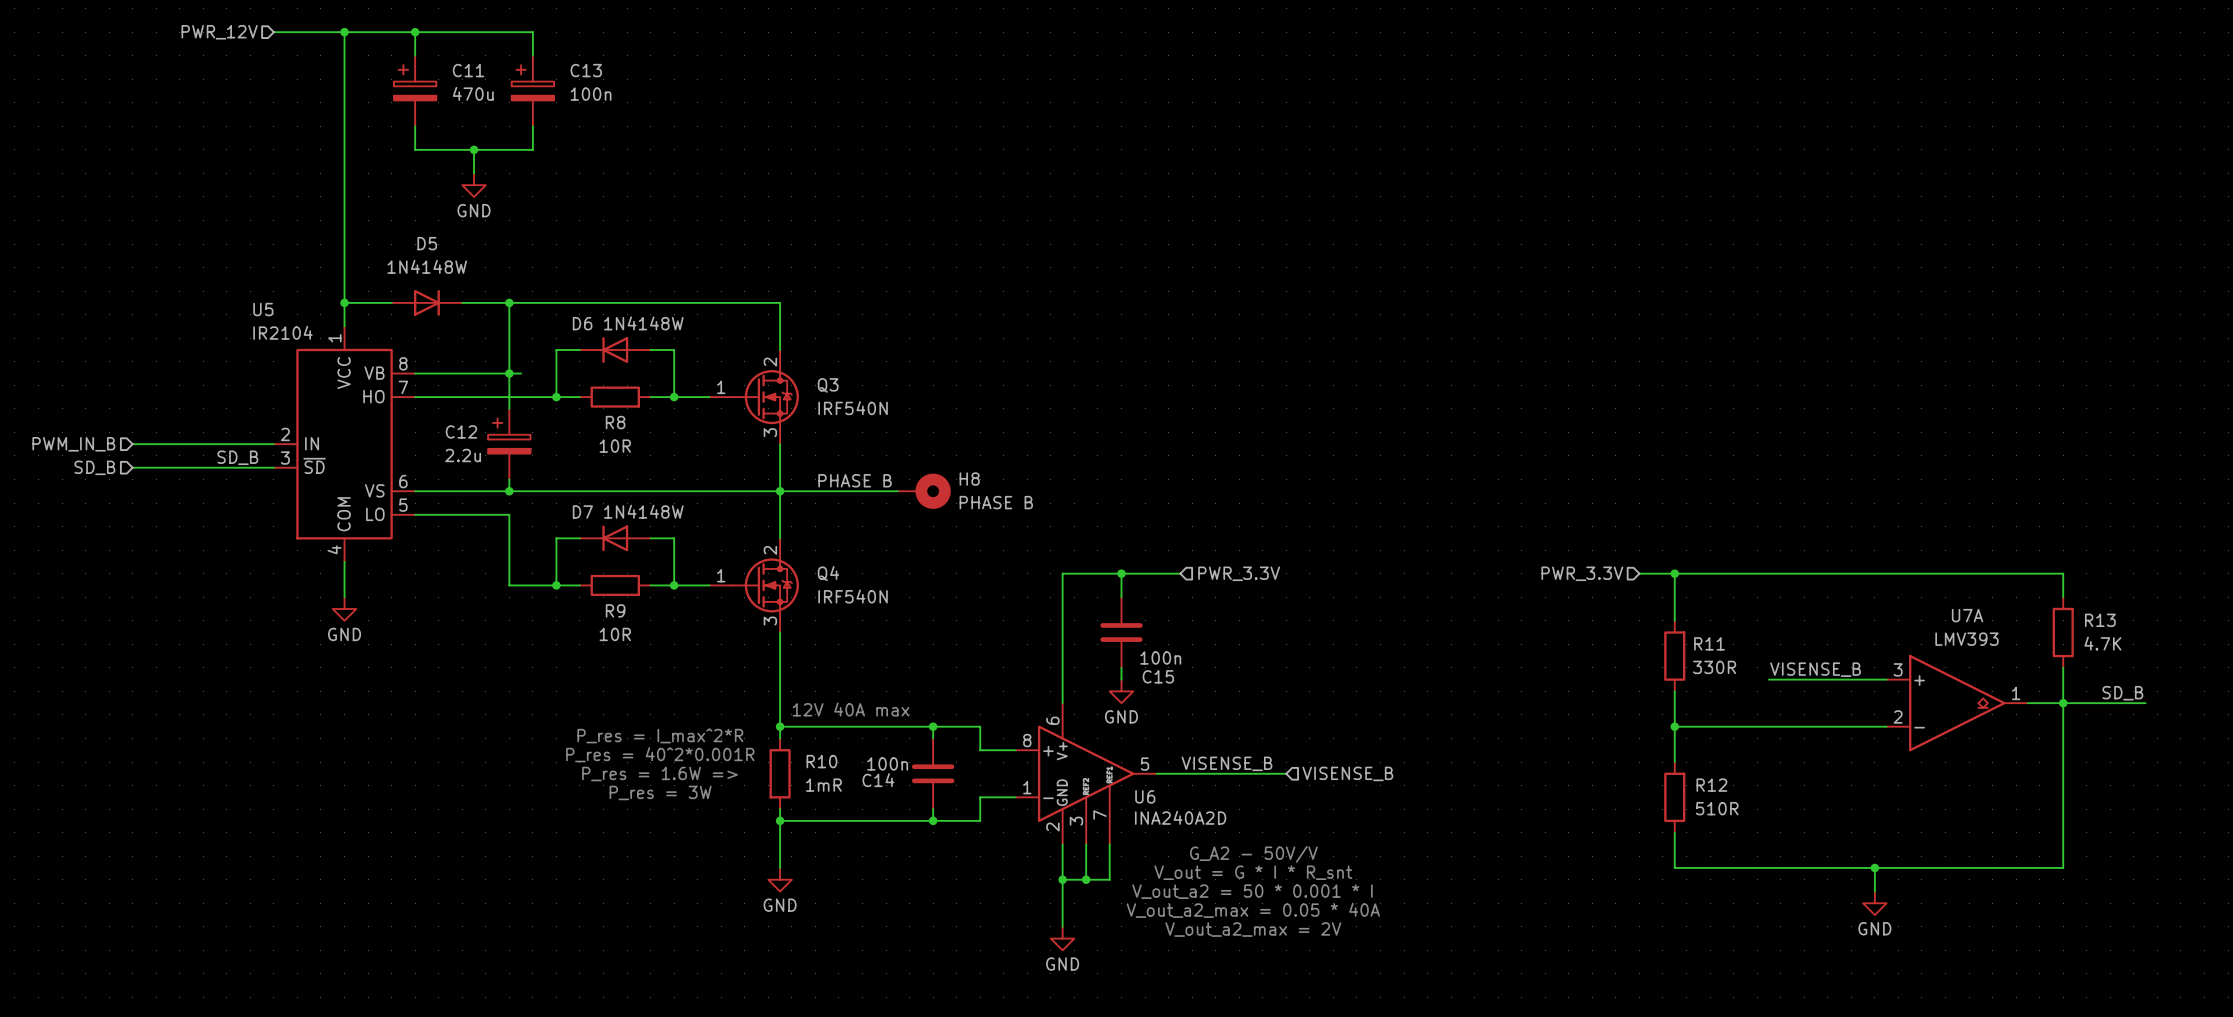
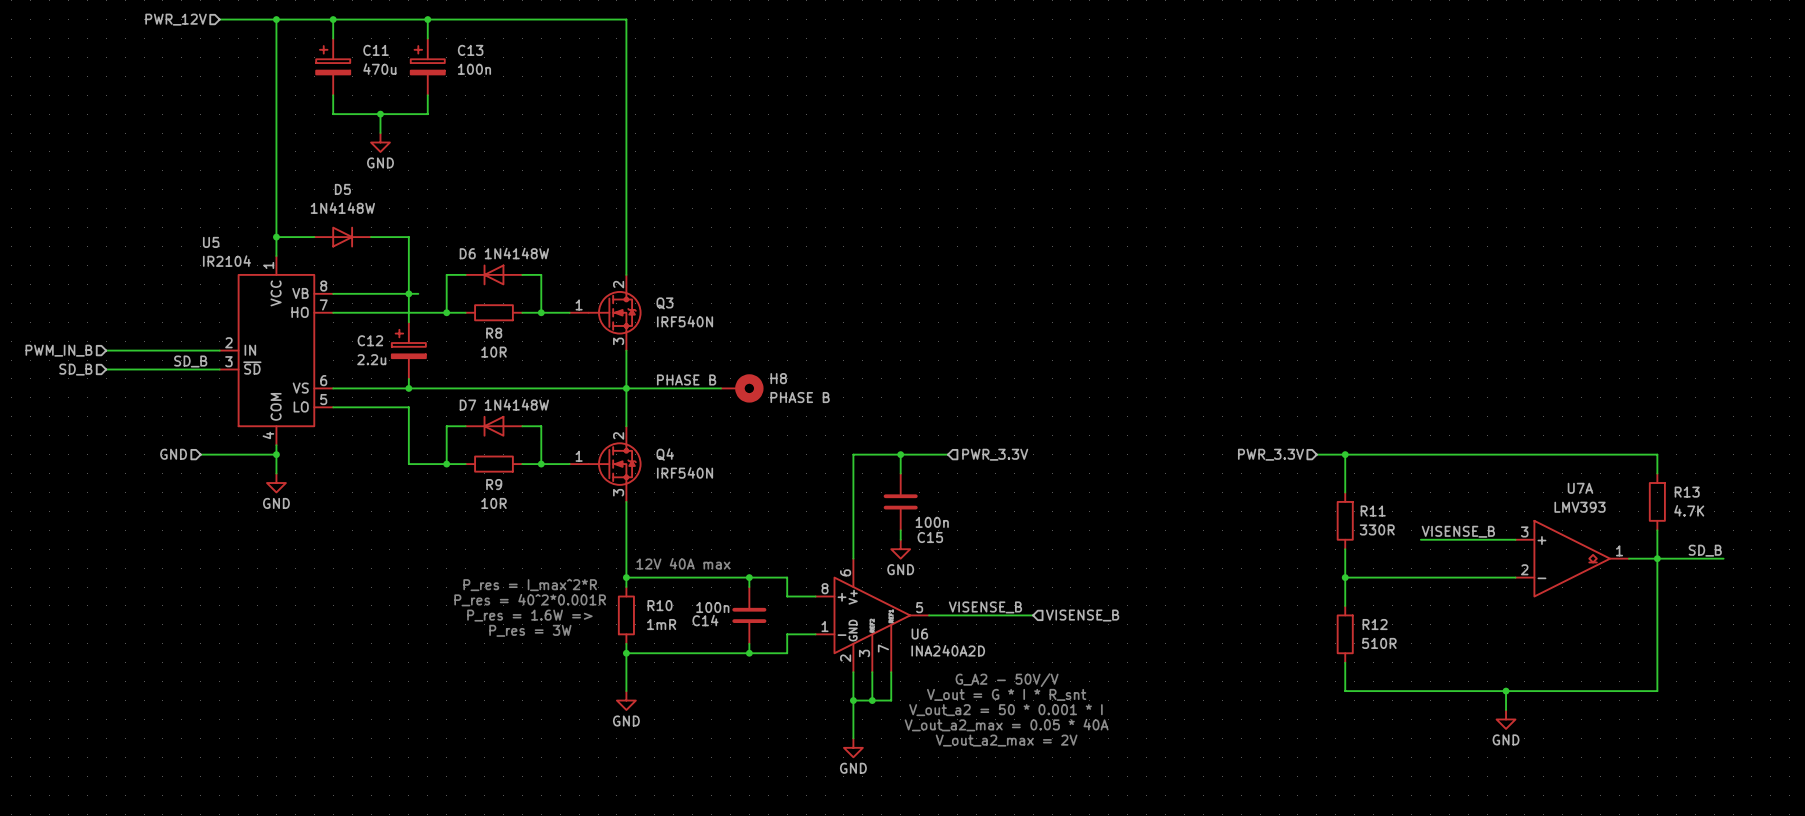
junction: none -> (427, 19)
wire: (509, 302) (780, 302) -> (427, 19) (626, 19) (626, 237)
junction: (509, 302) -> none
hierarchical label: none -> GND (173, 454)
wire: none -> (200, 454) (276, 454)
junction: none -> (276, 454)

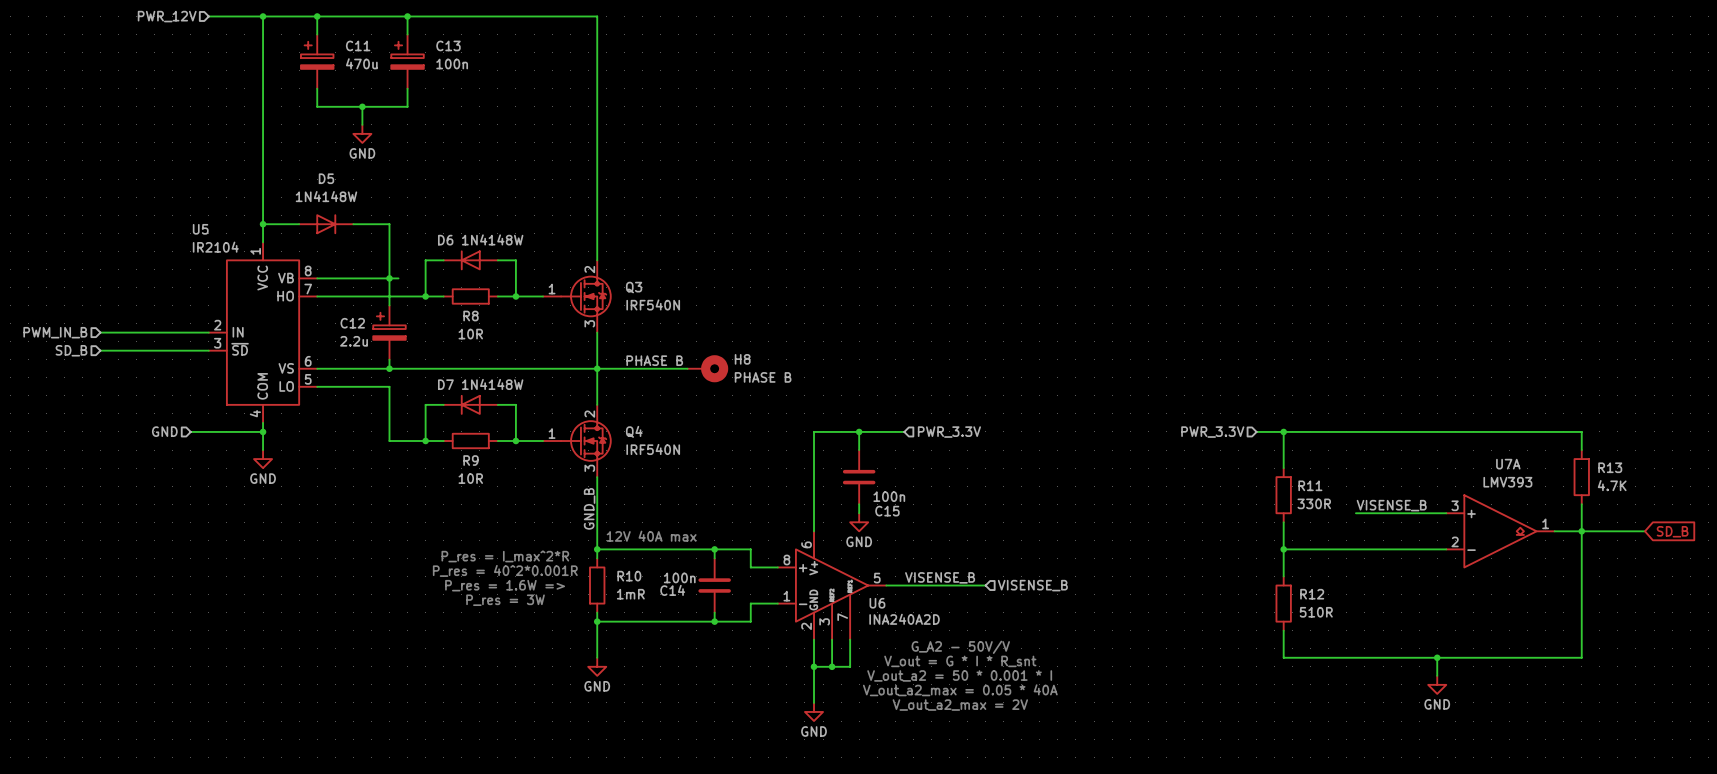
label: SD_B (190, 361) -> none
label: none -> GND_B (589, 508)
label: SD_B (1705, 550) -> none
global label: none -> SD_B (1672, 531)

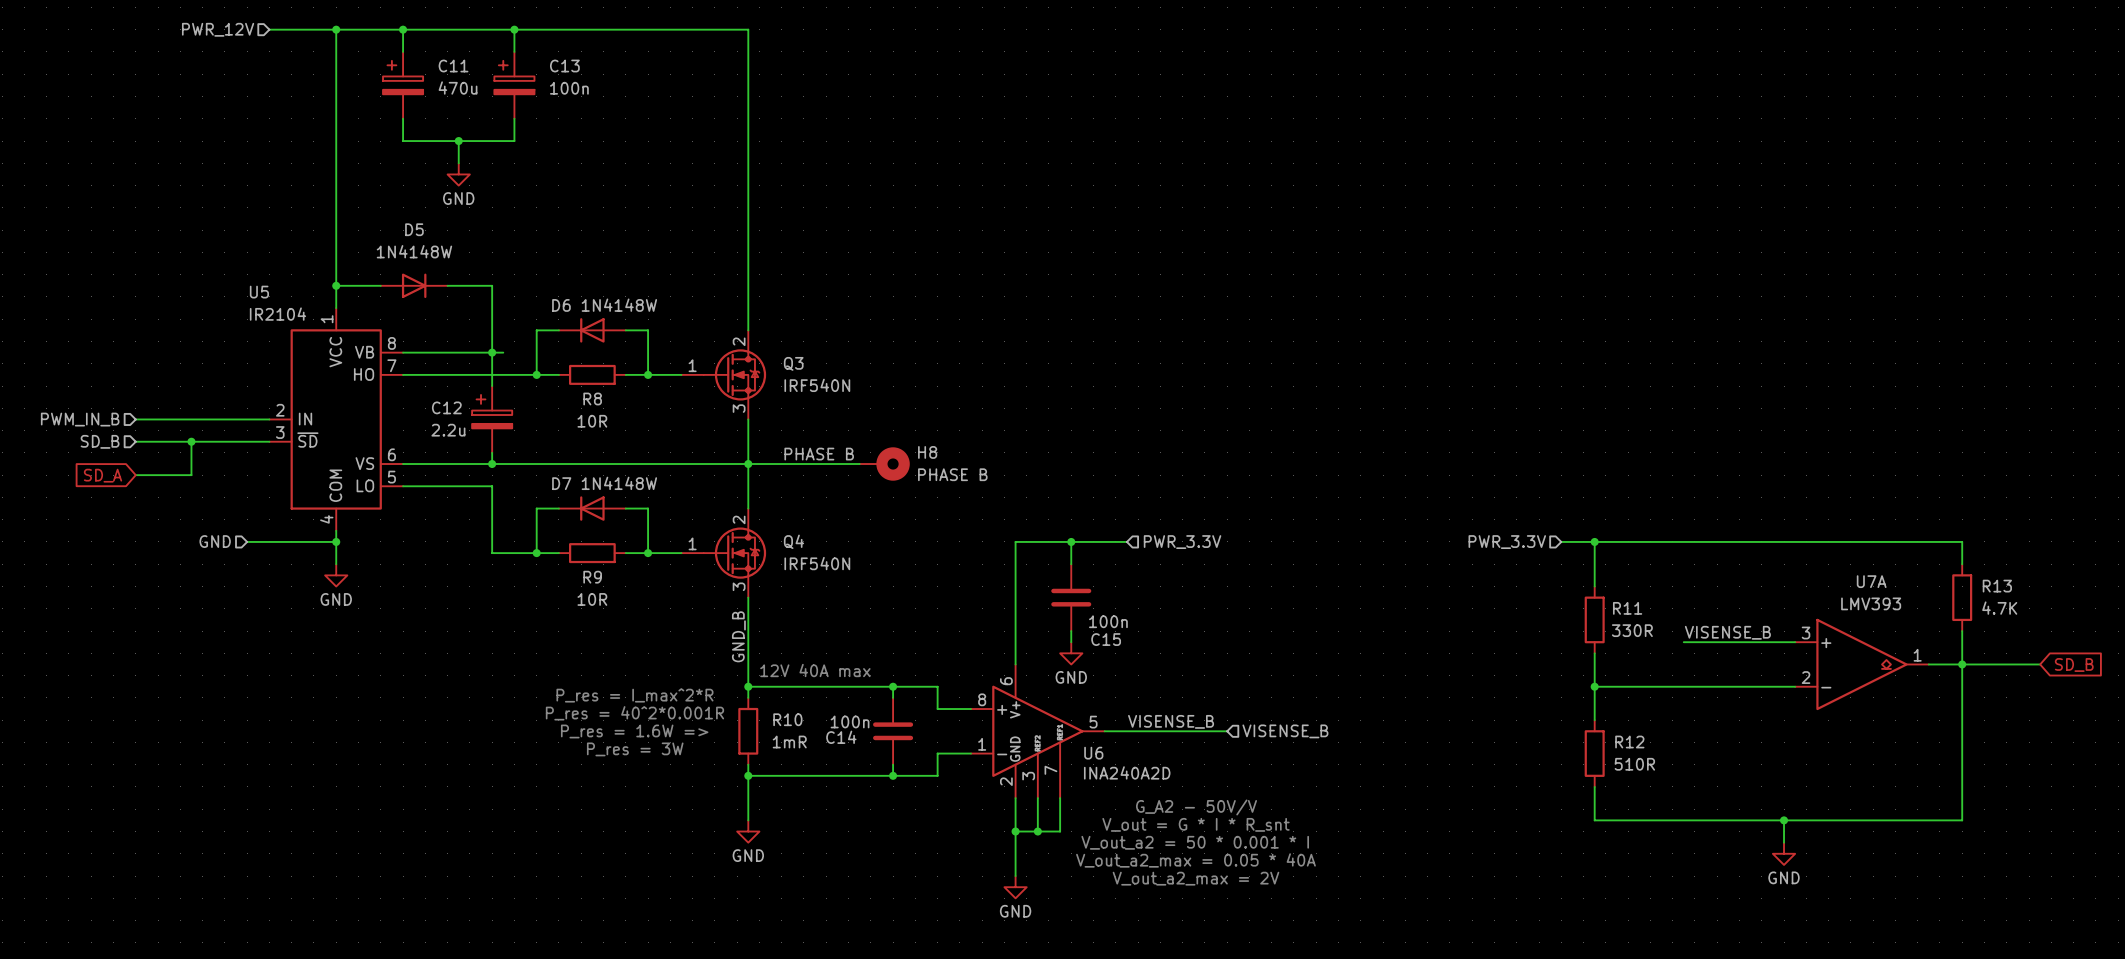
wire: none -> (191, 441) (191, 475) (135, 475)
junction: none -> (191, 441)
global label: none -> SD_A (103, 475)

